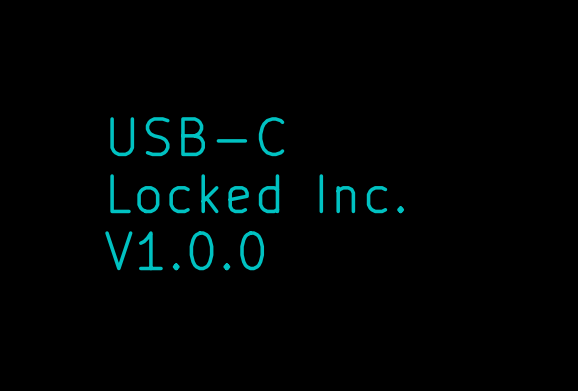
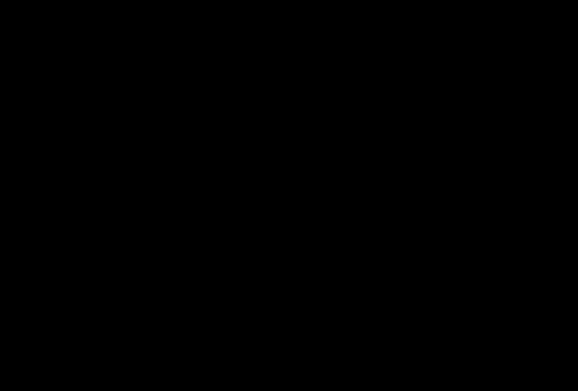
text: USB-C (197, 136) -> none
text: Locked Inc. (257, 193) -> none
text: V1.0.0 (184, 250) -> none

